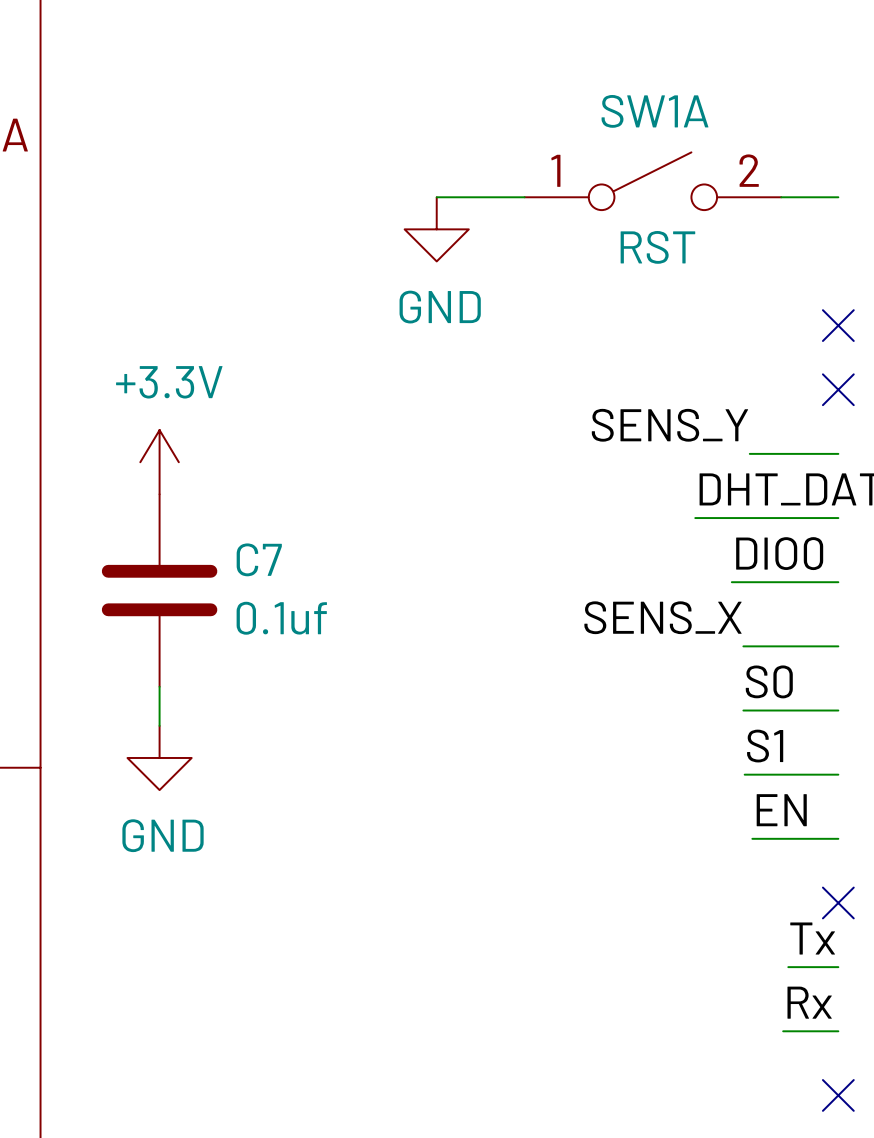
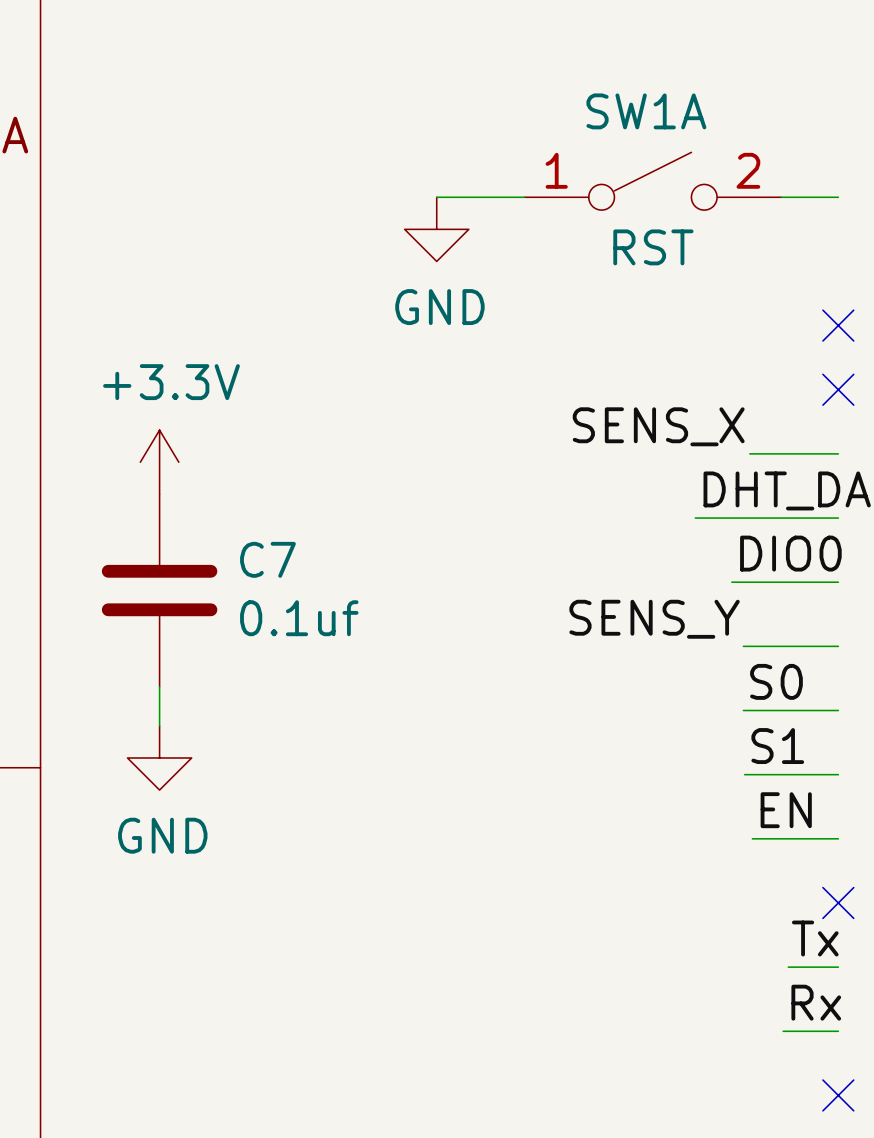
label: SENS_Y (669, 425) -> SENS_X (658, 426)
label: SENS_X (663, 617) -> SENS_Y (654, 619)

